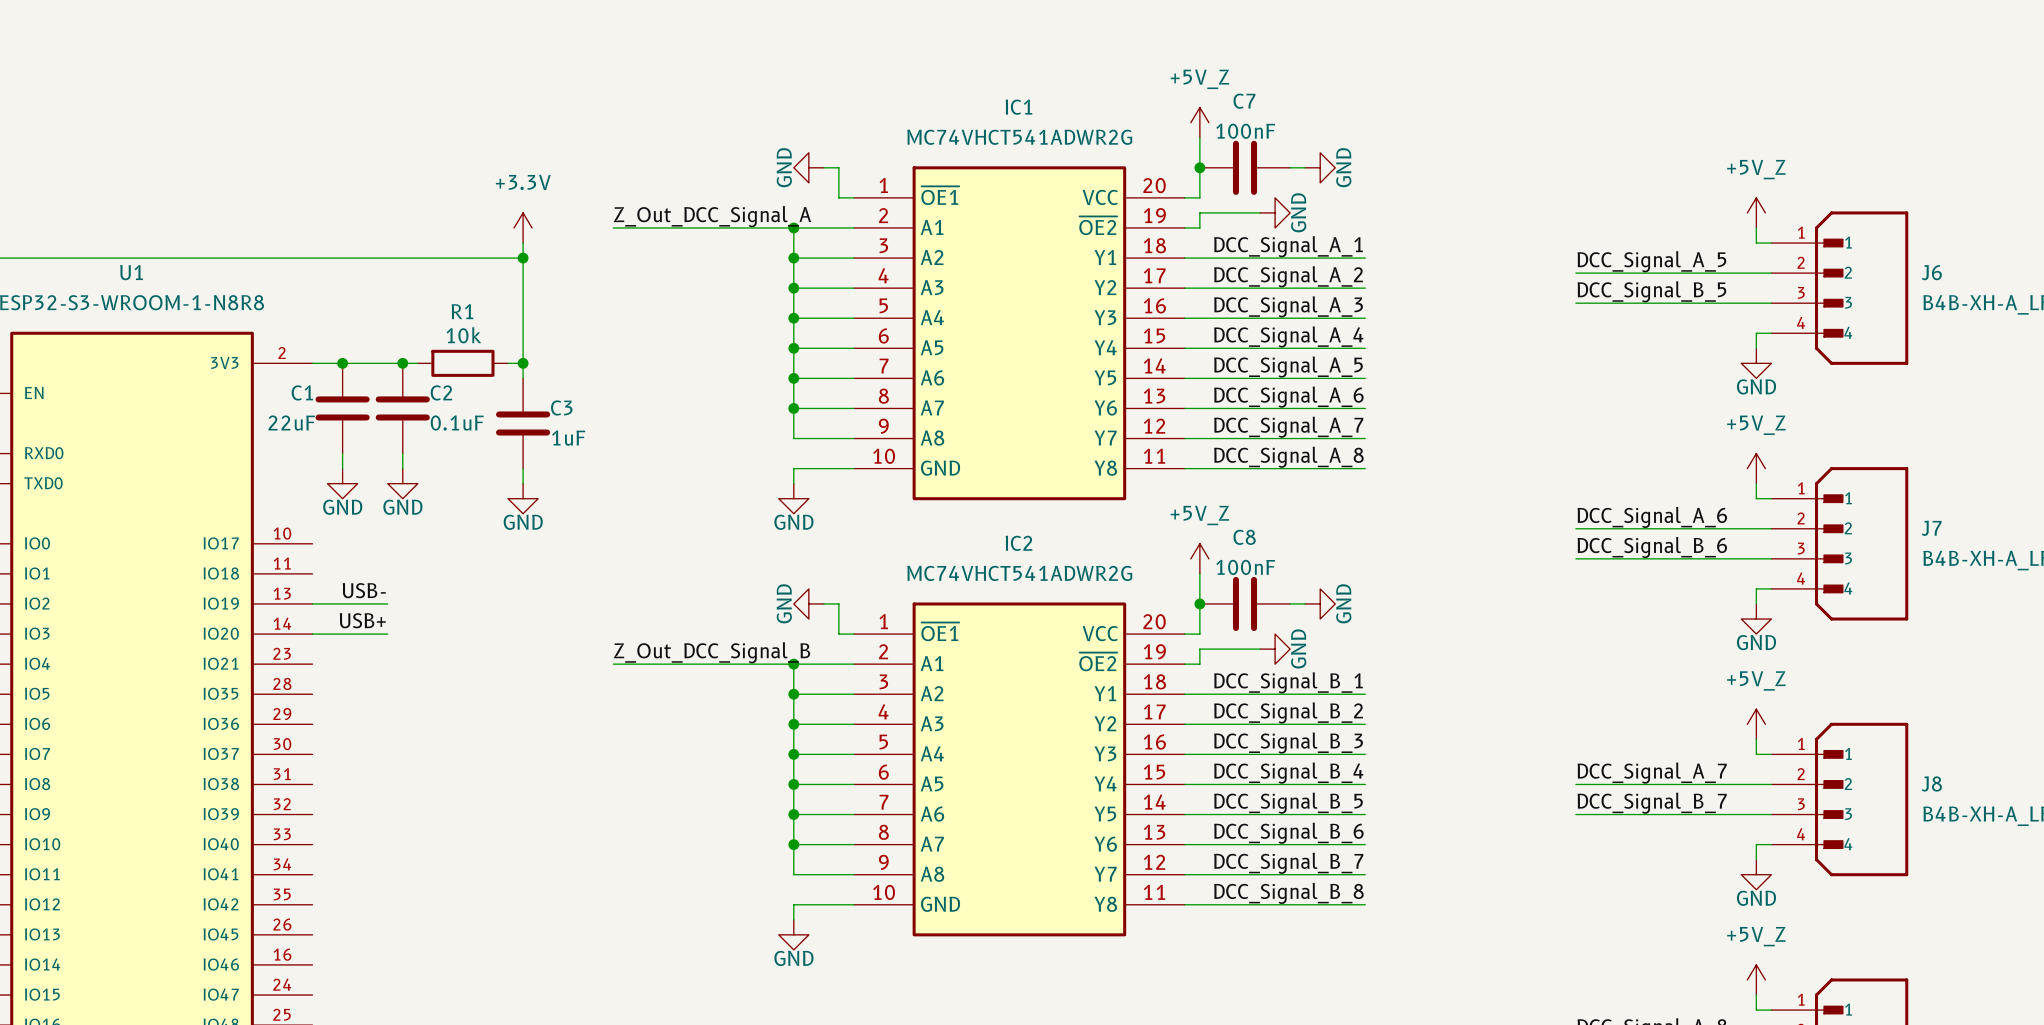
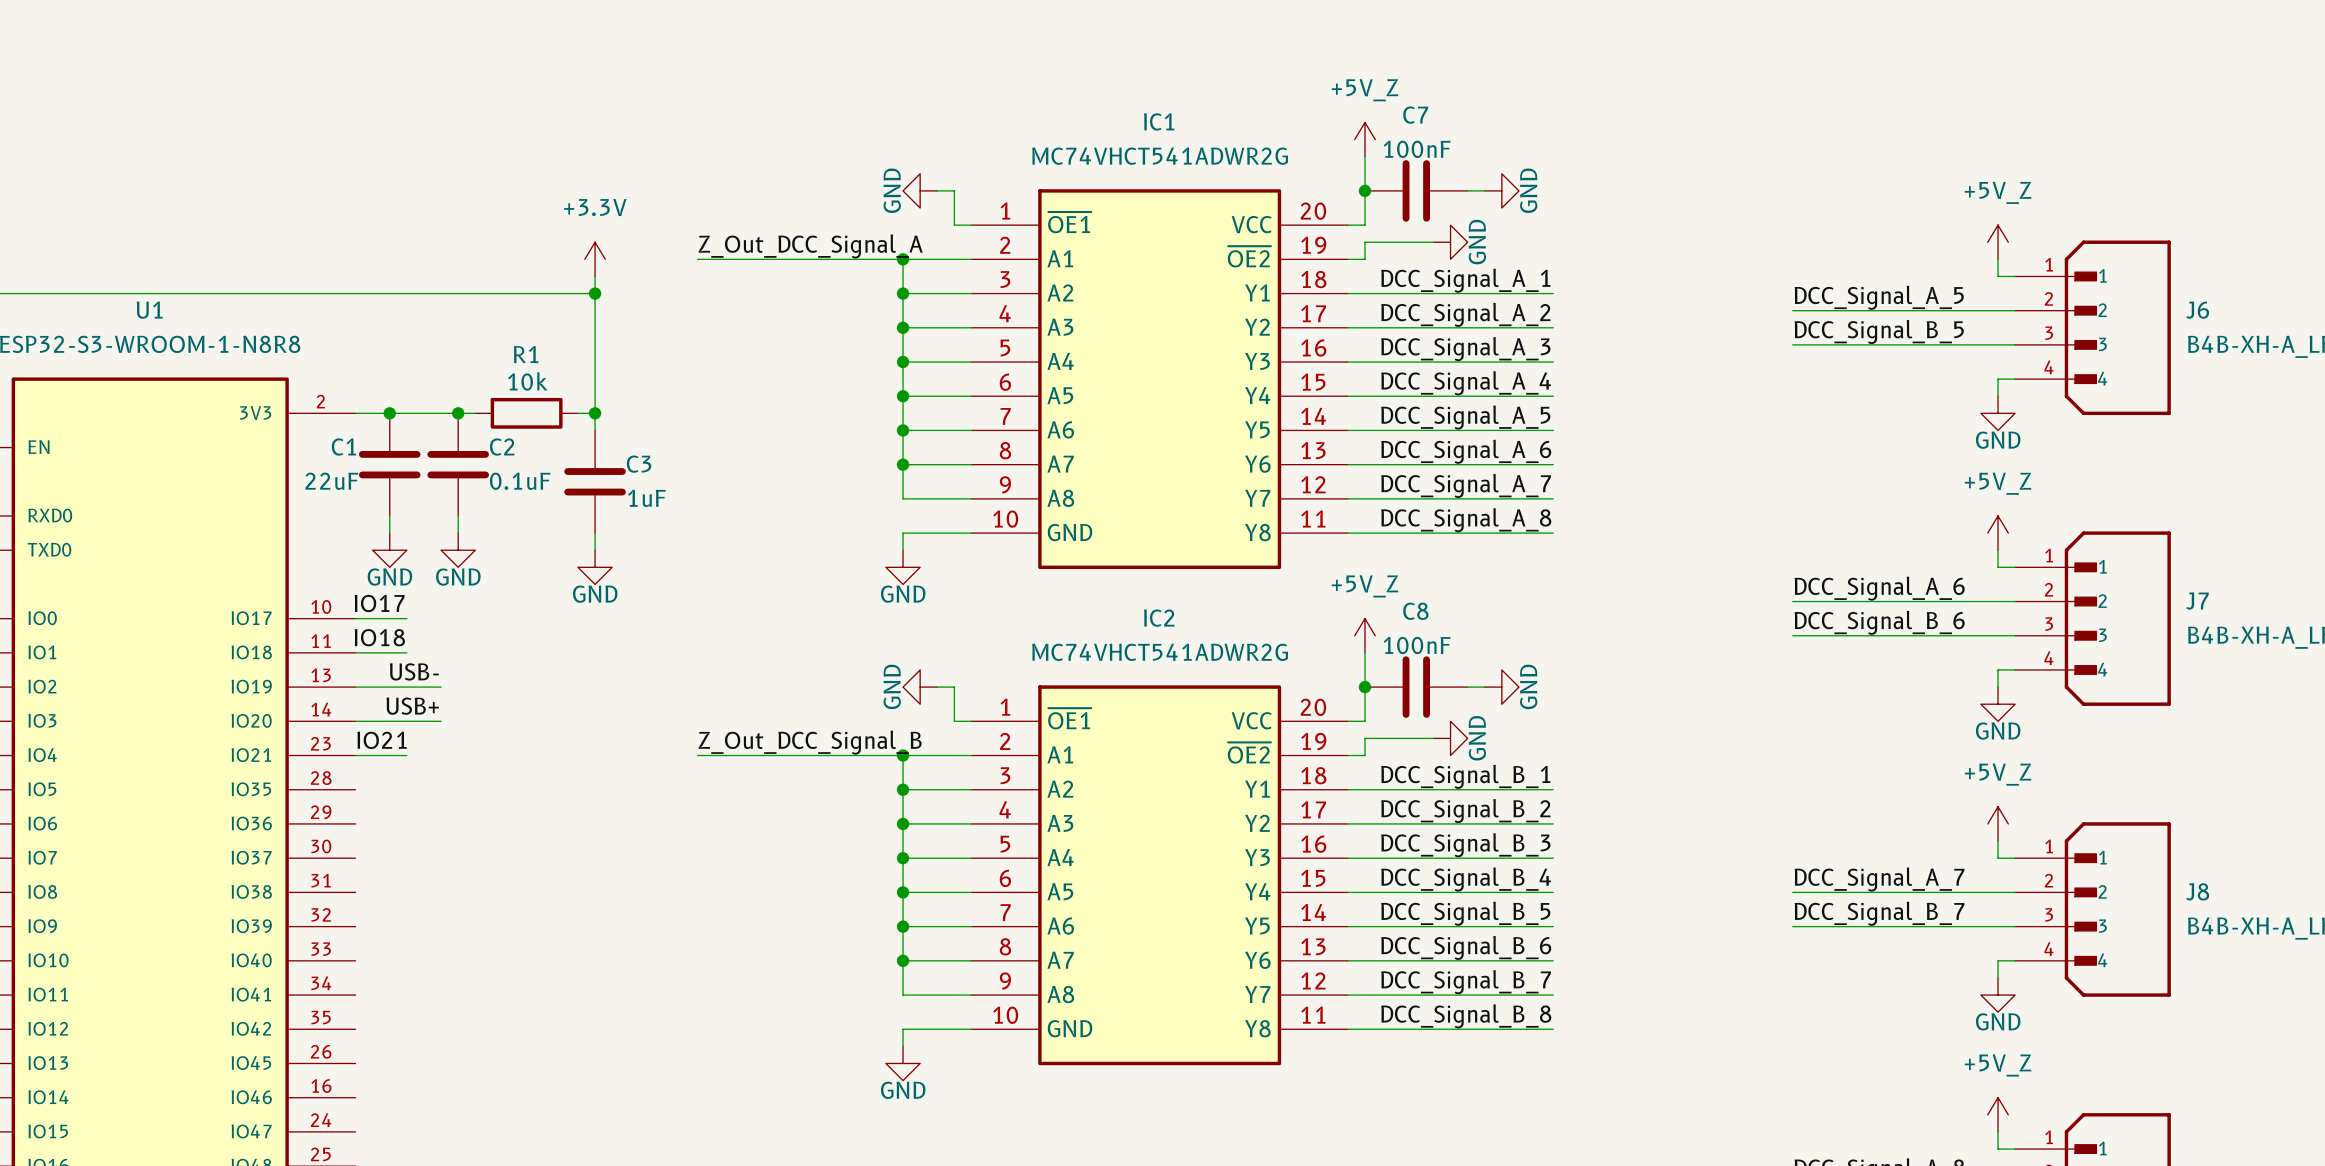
label: none -> IO17 (379, 603)
wire: none -> (355, 618) (406, 618)
label: none -> IO18 (379, 637)
wire: none -> (355, 652) (406, 652)
label: none -> IO21 (382, 740)
wire: none -> (355, 755) (406, 755)

